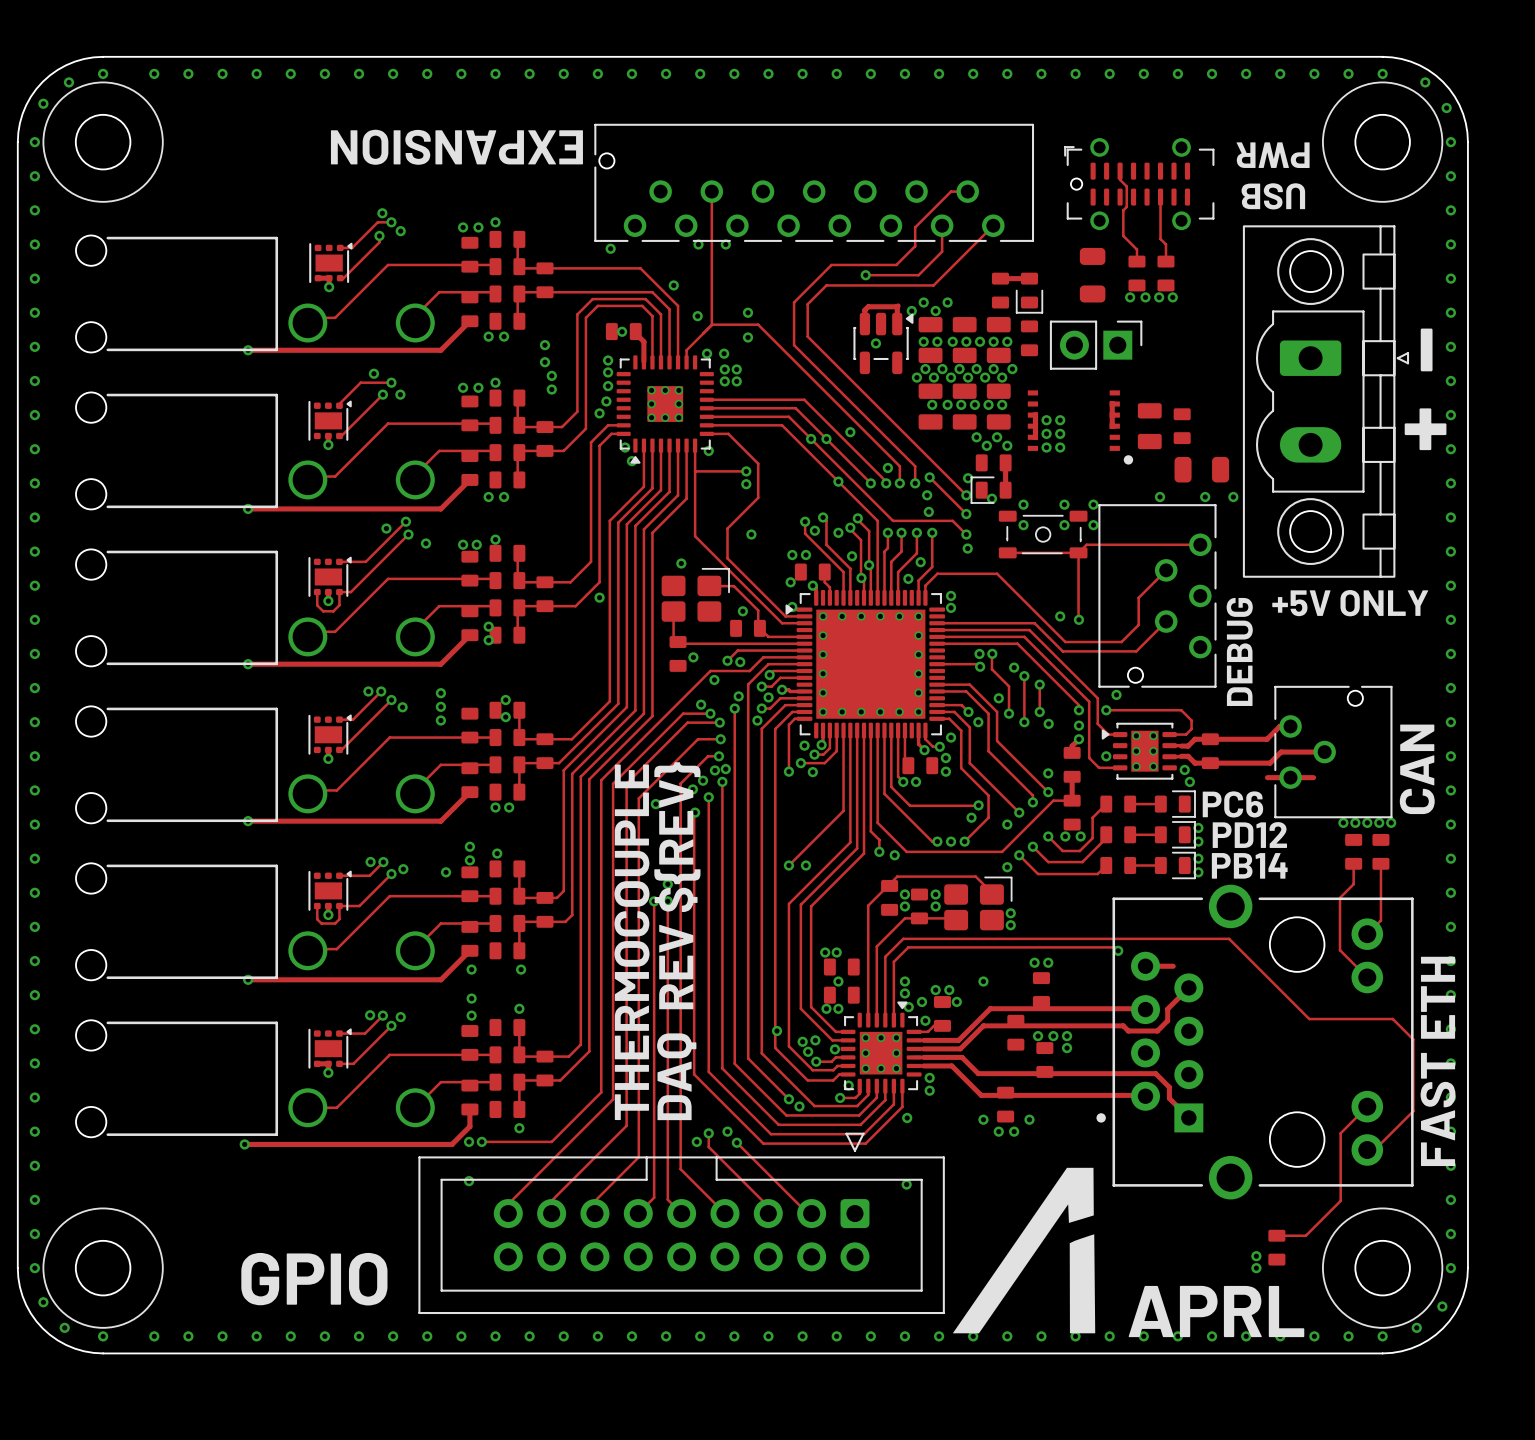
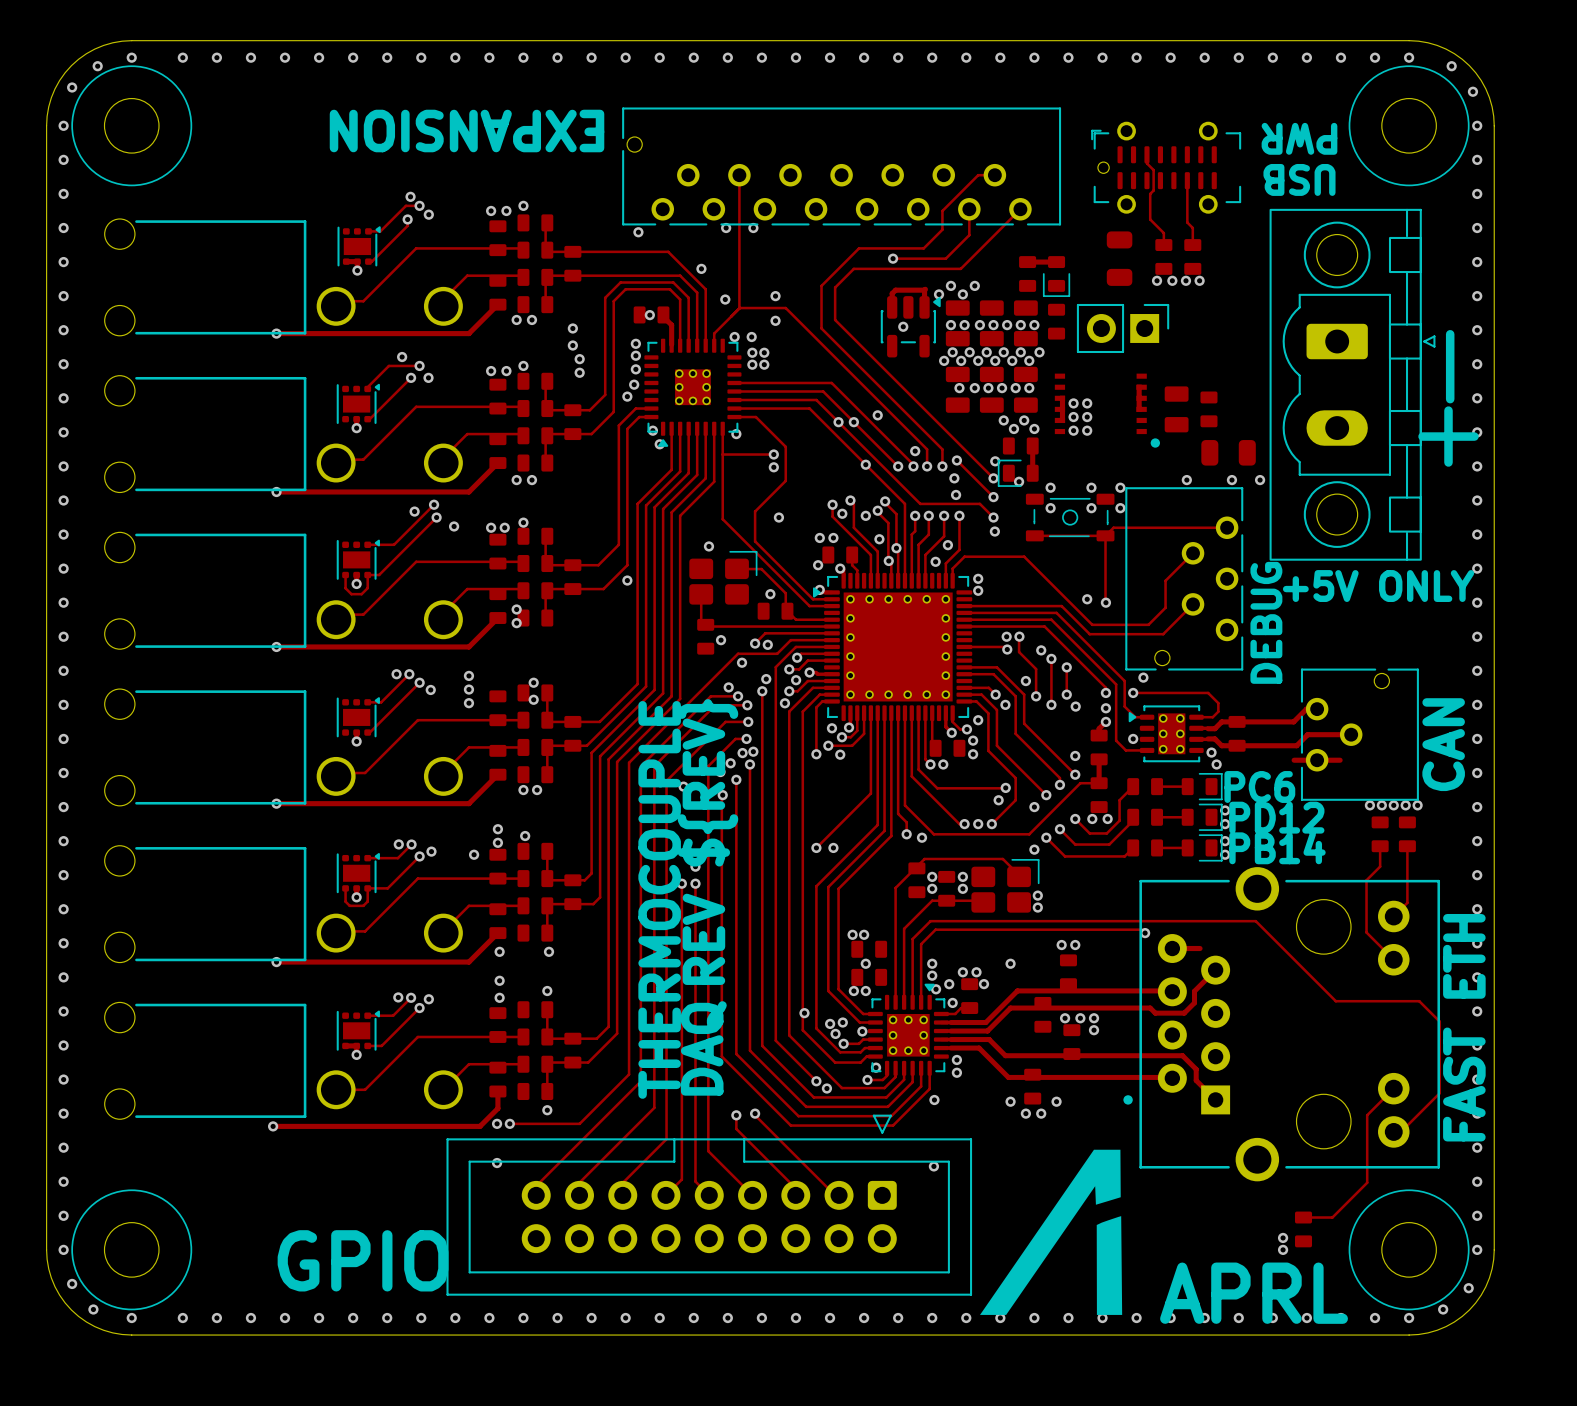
track: none -> (755, 1115) (764, 1124)
via: (696, 1141) -> none
via: (736, 1142) -> none

